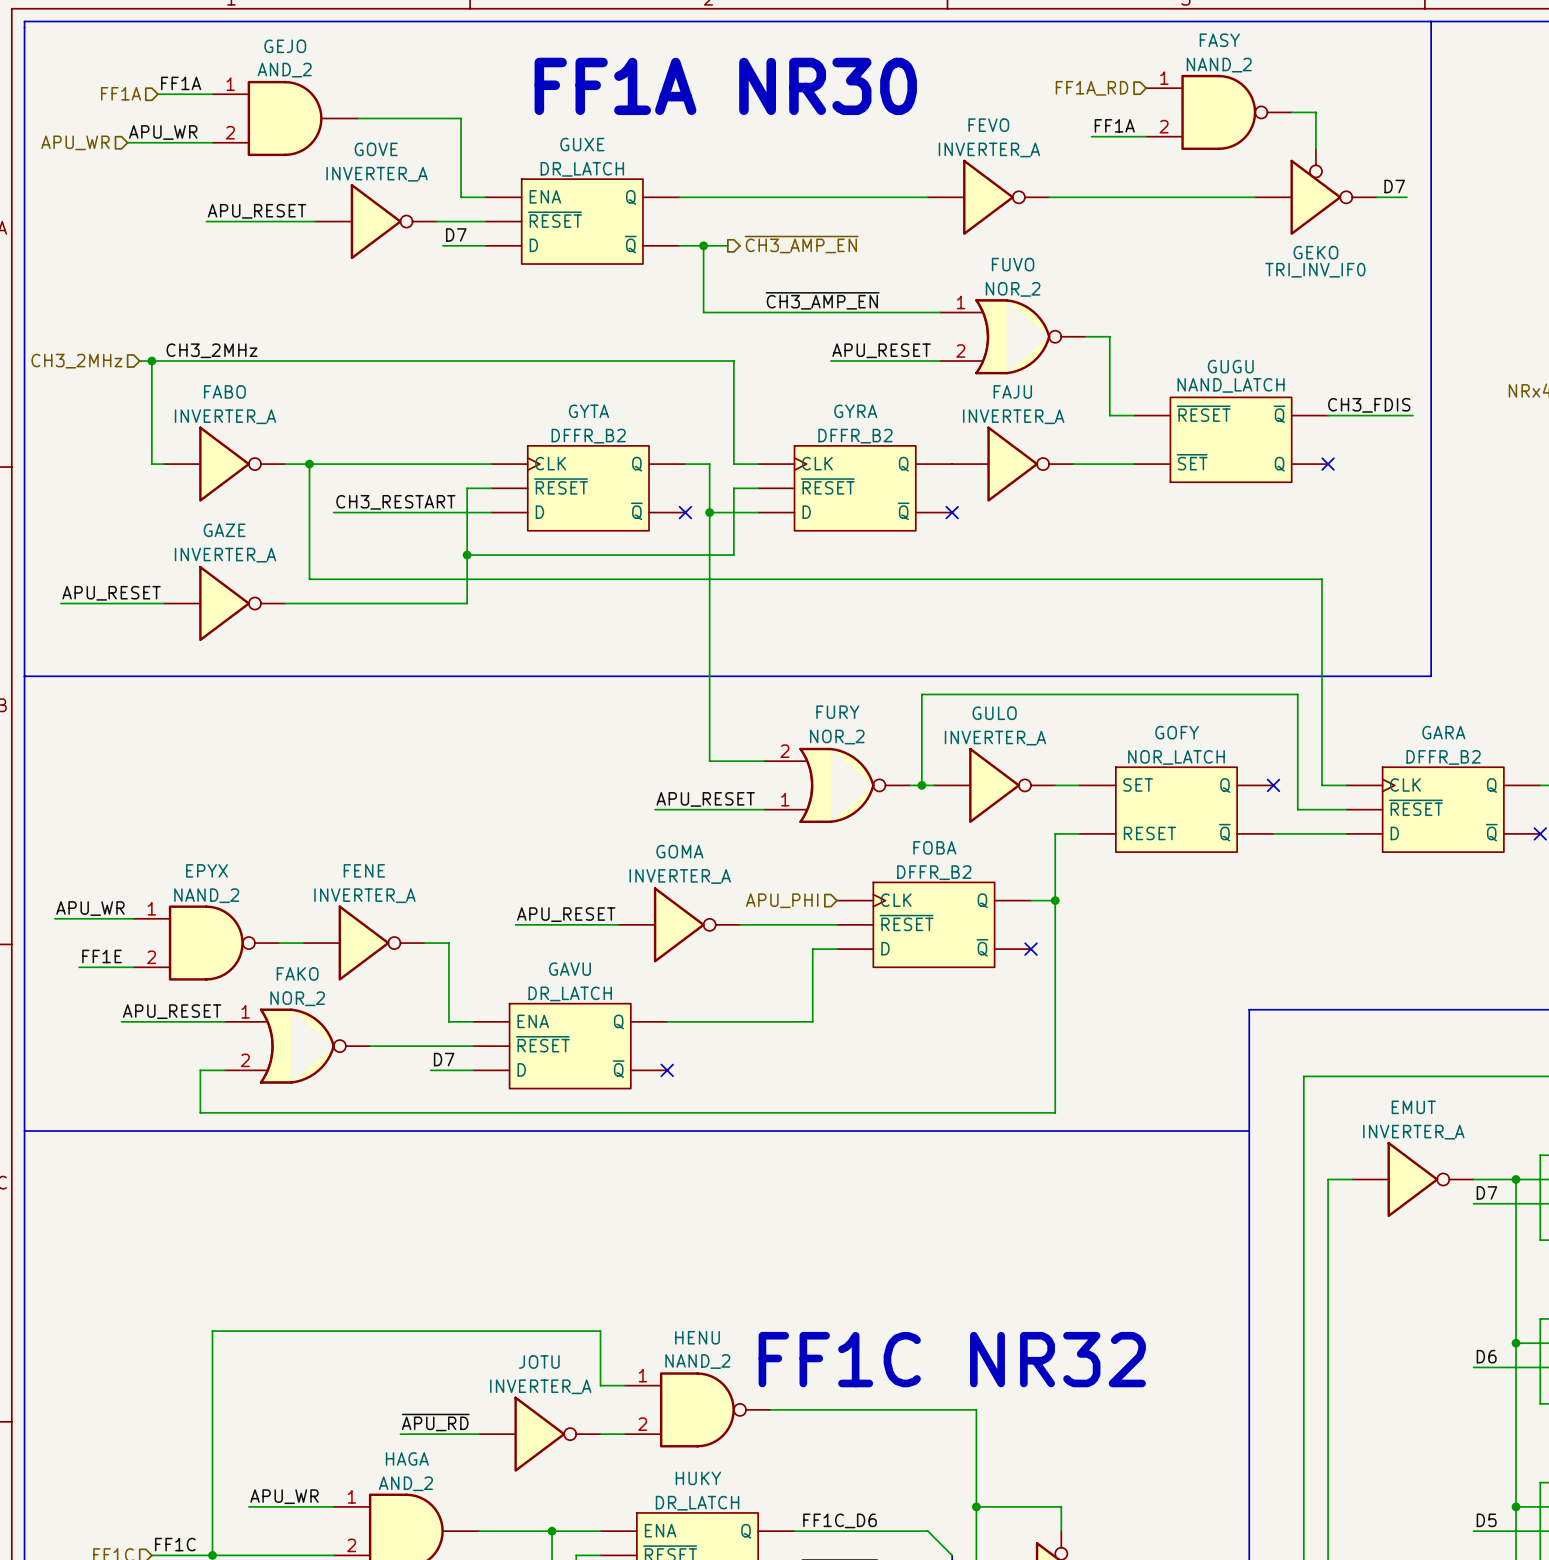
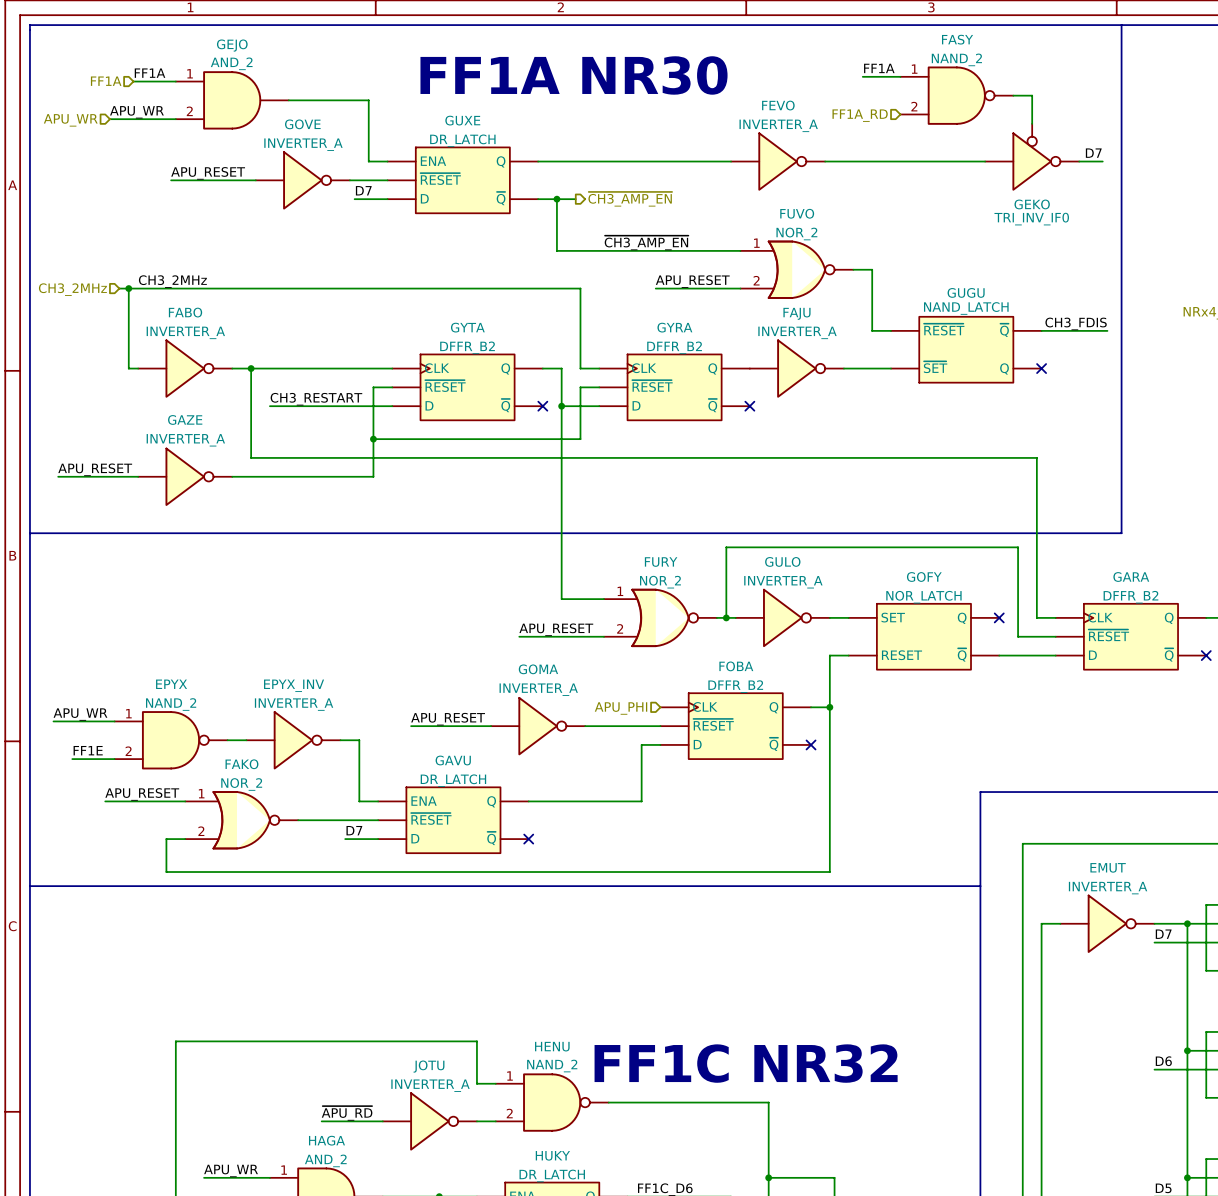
hierarchical label position: FF1A_RD (1092, 88) -> FF1A_RD (860, 115)
wire: none -> (862, 76) (900, 76)
label position: FF1A (1114, 125) -> FF1A (879, 68)
wire: (1091, 136) (1146, 136) -> none
FURY flip: as is (836, 785) -> up-down (660, 617)
FENE name: FENE (364, 870) -> EPYX_INV (294, 685)

